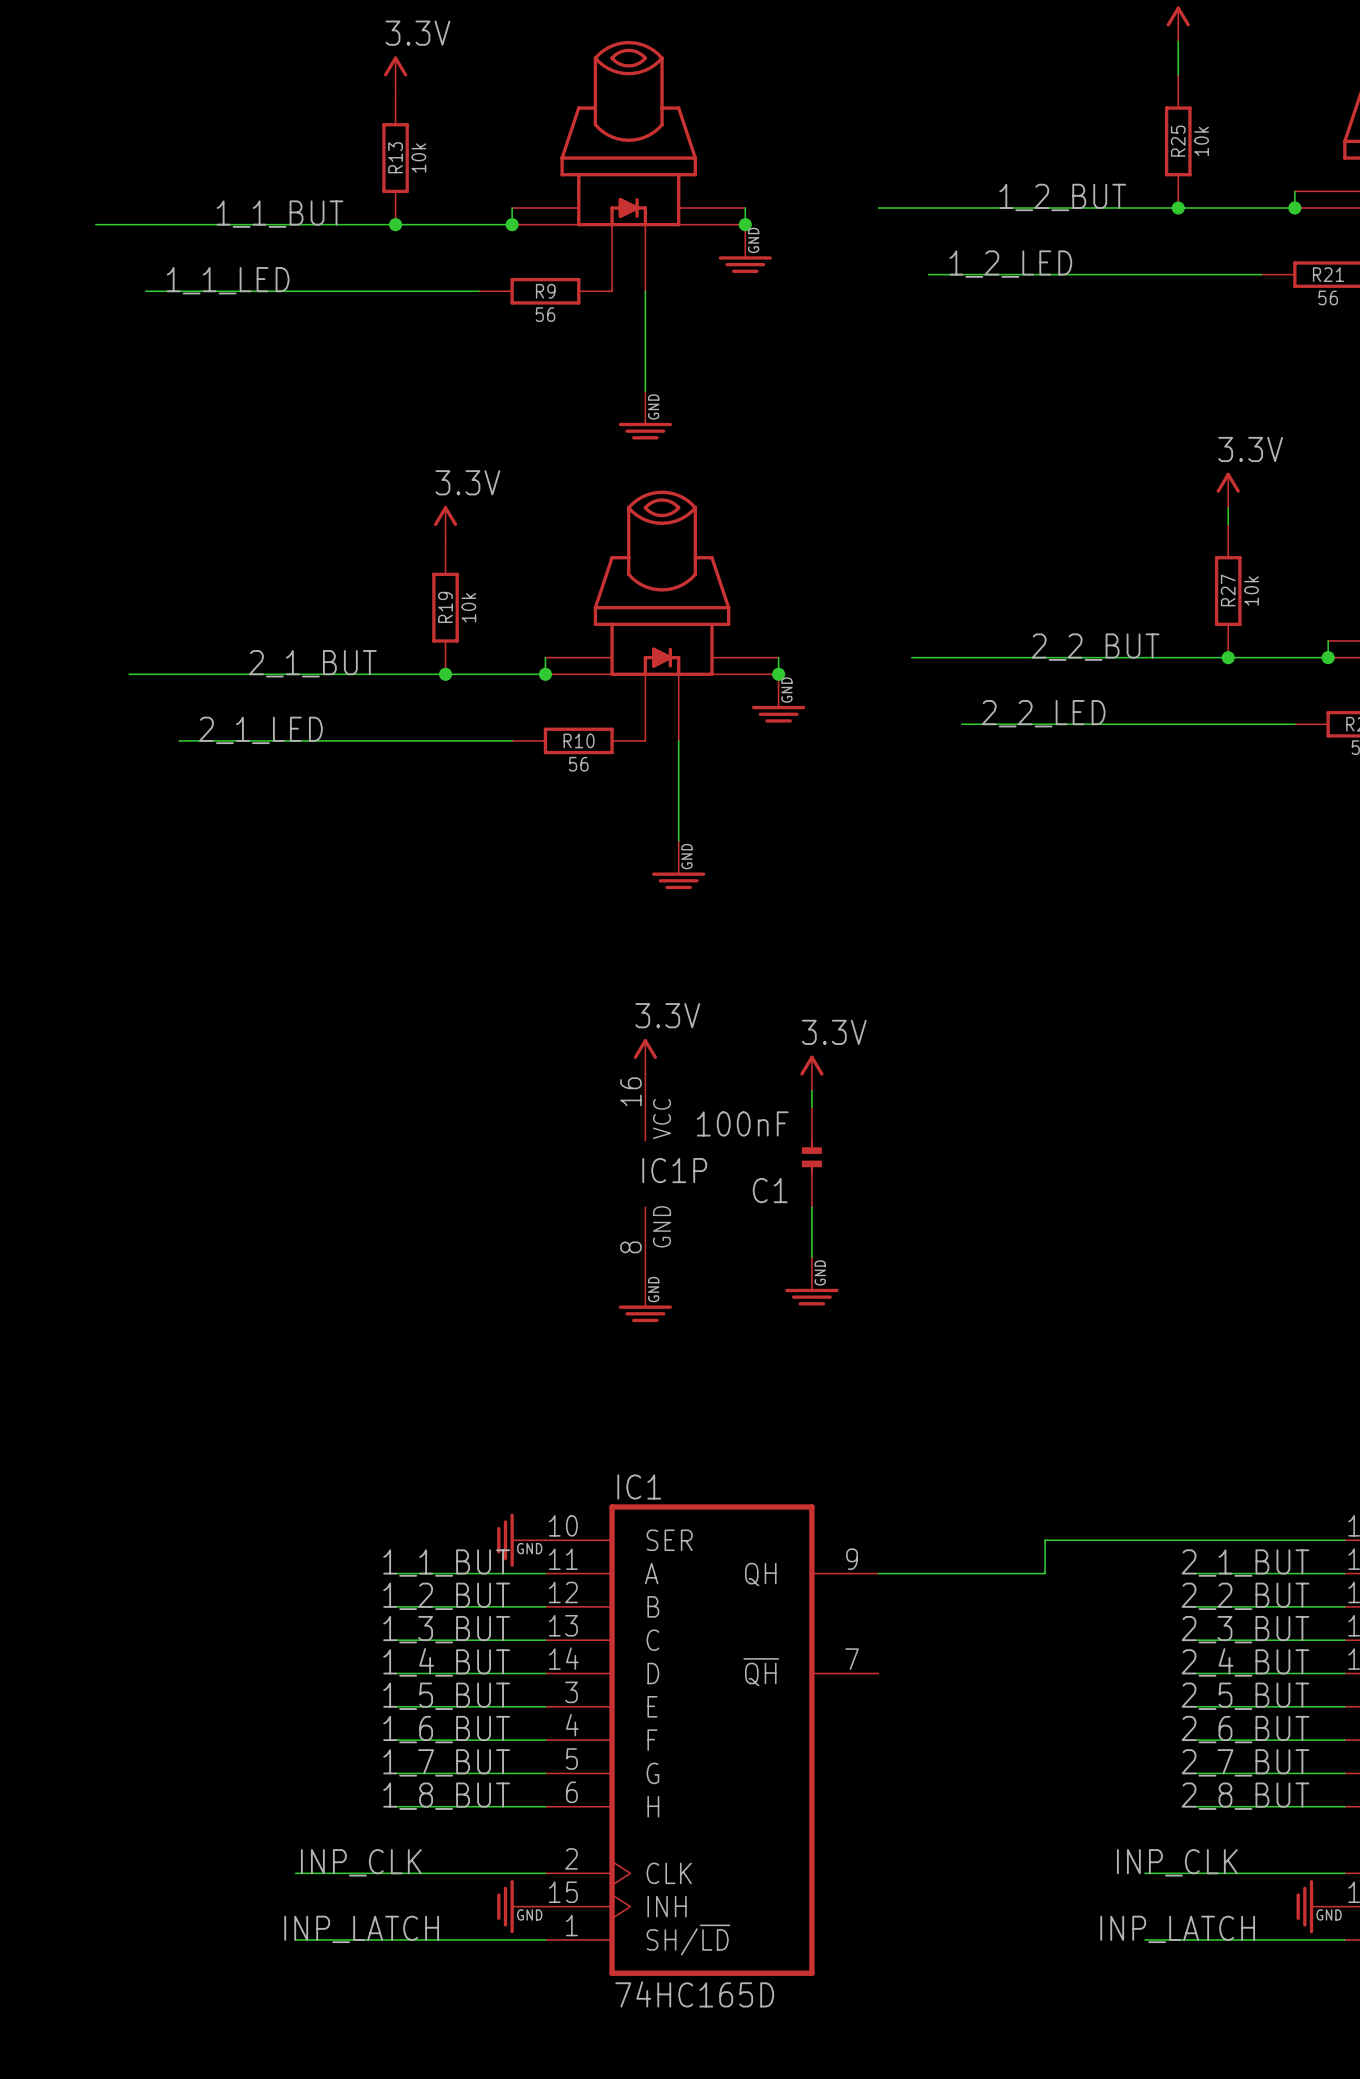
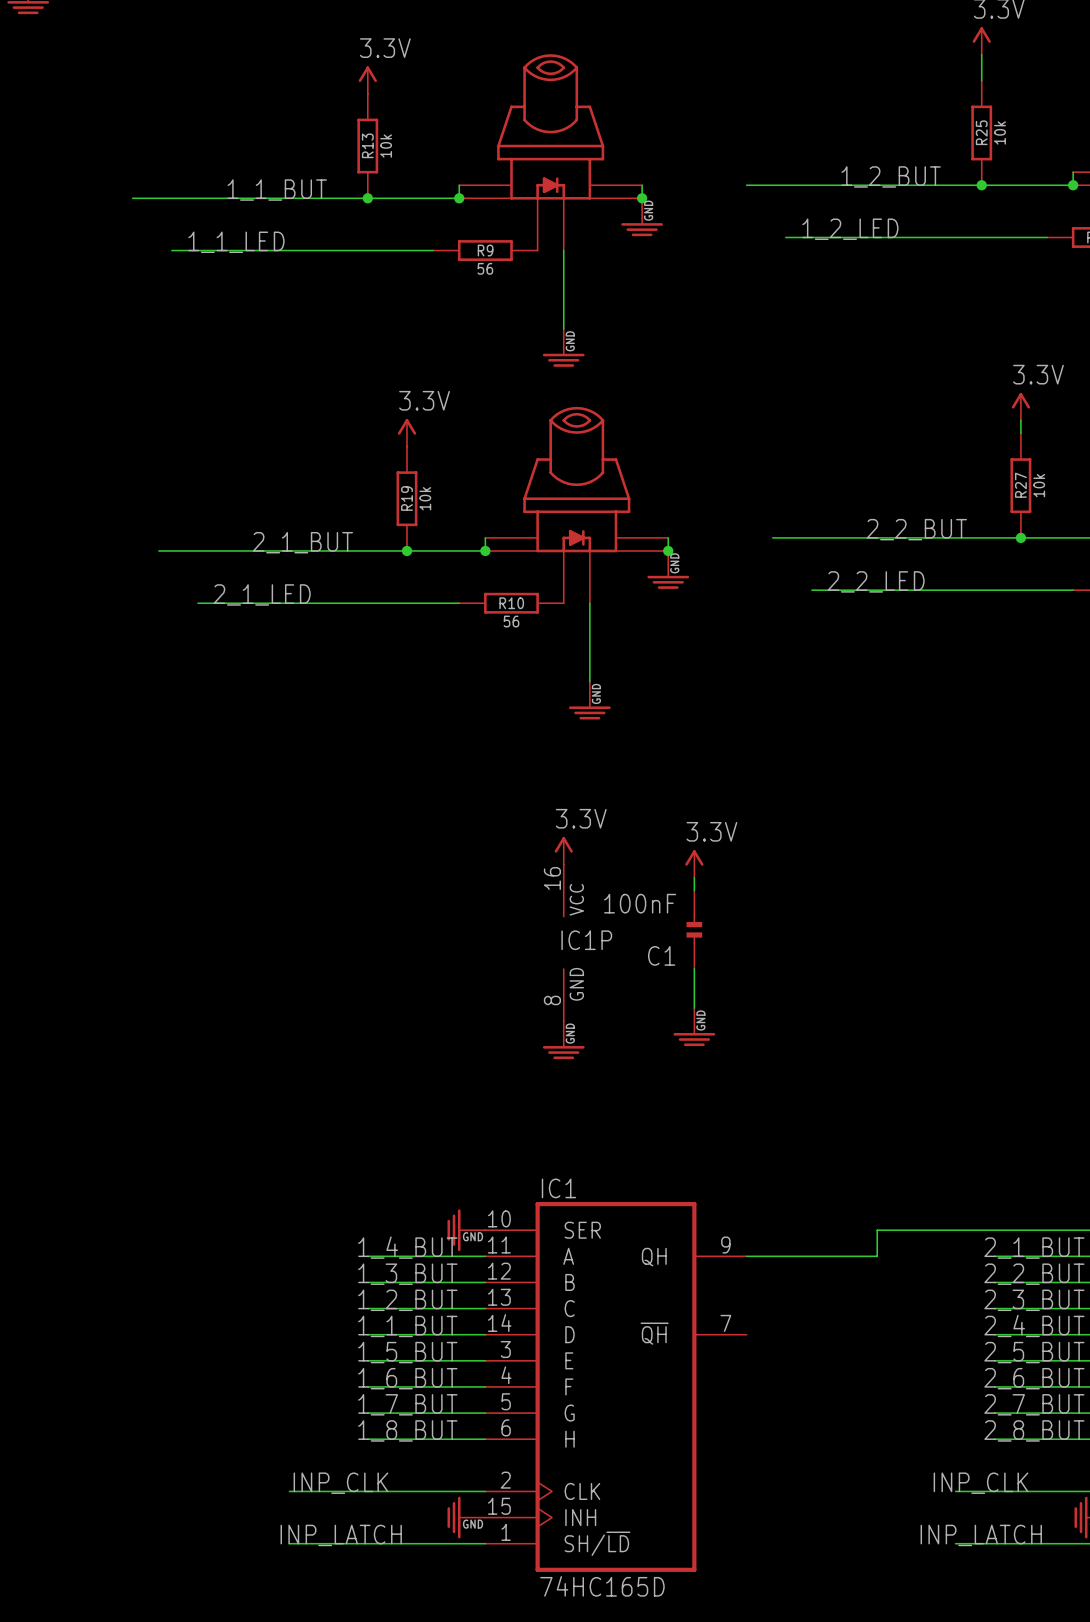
label: 1_1_BUT (446, 1563) -> 1_4_BUT (407, 1247)
label: 1_2_BUT (446, 1596) -> 1_3_BUT (407, 1274)
label: 1_3_BUT (446, 1629) -> 1_2_BUT (407, 1300)
label: 1_4_BUT (446, 1662) -> 1_1_BUT (407, 1326)

